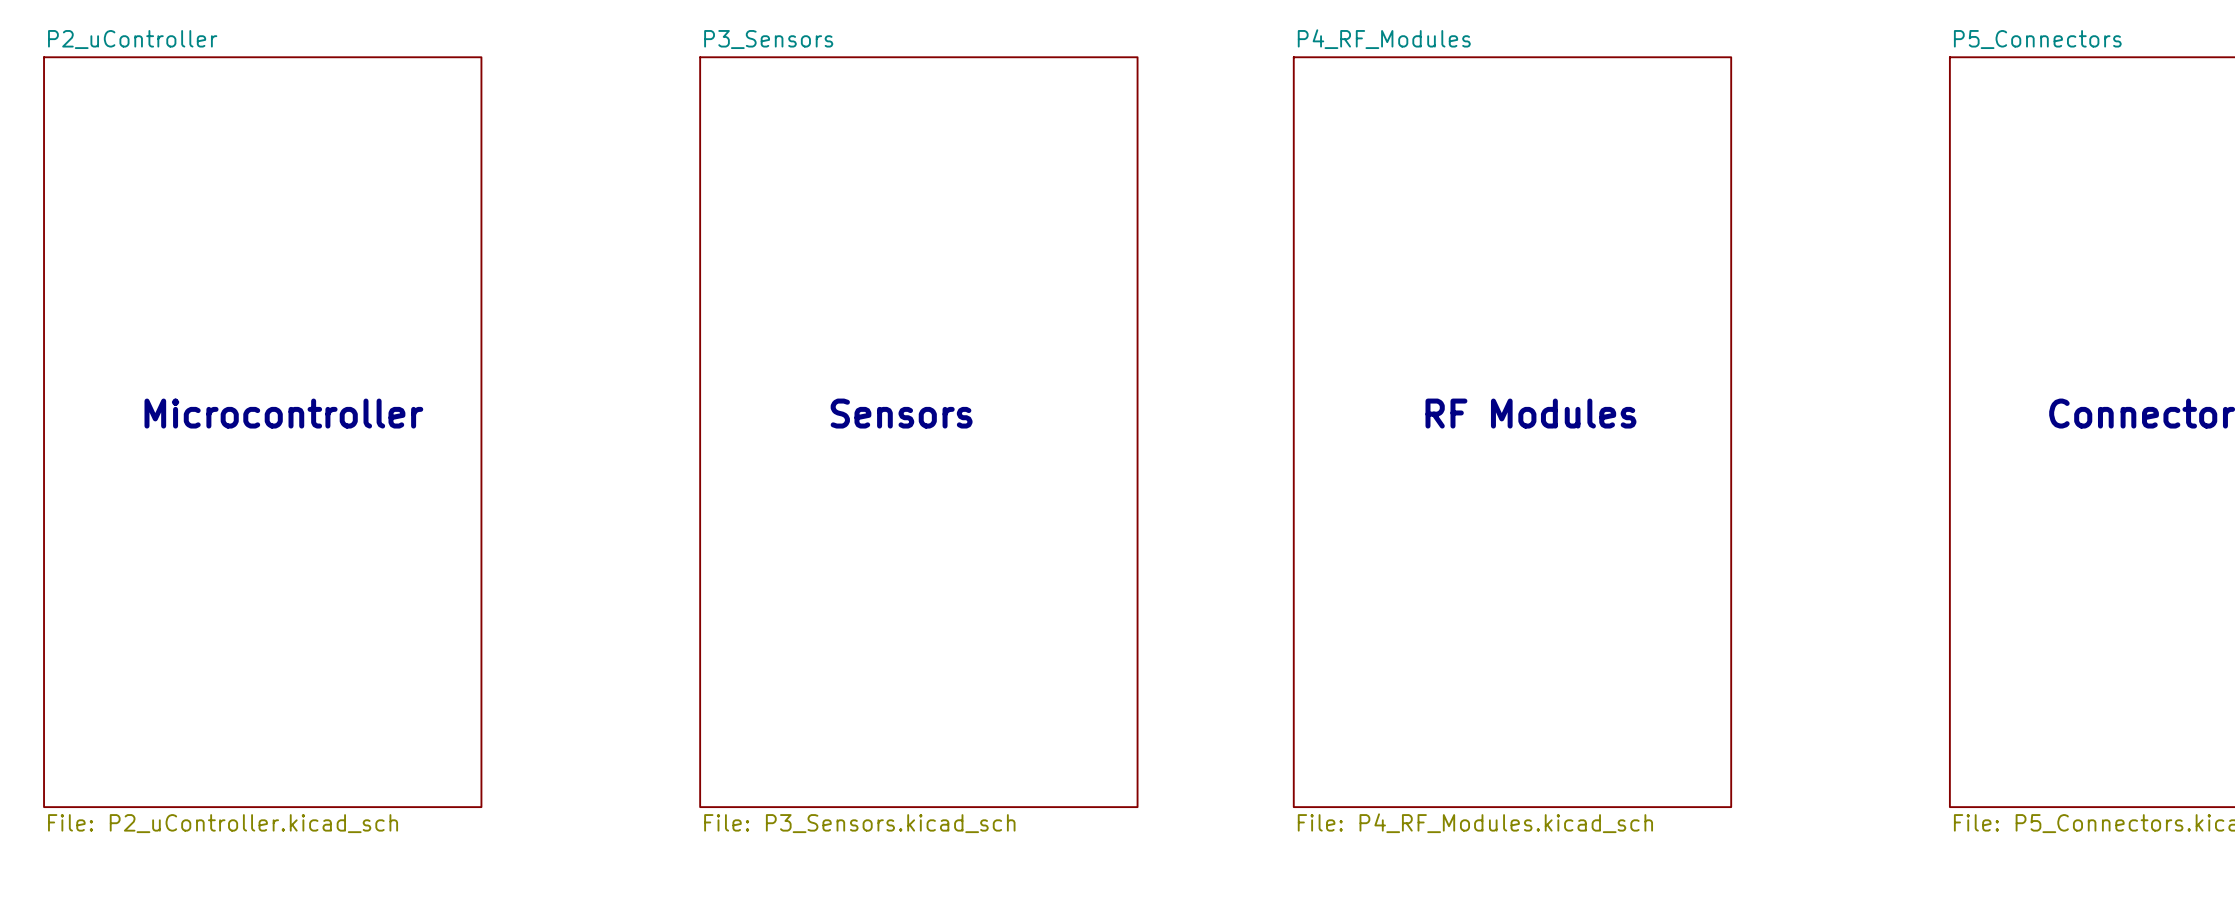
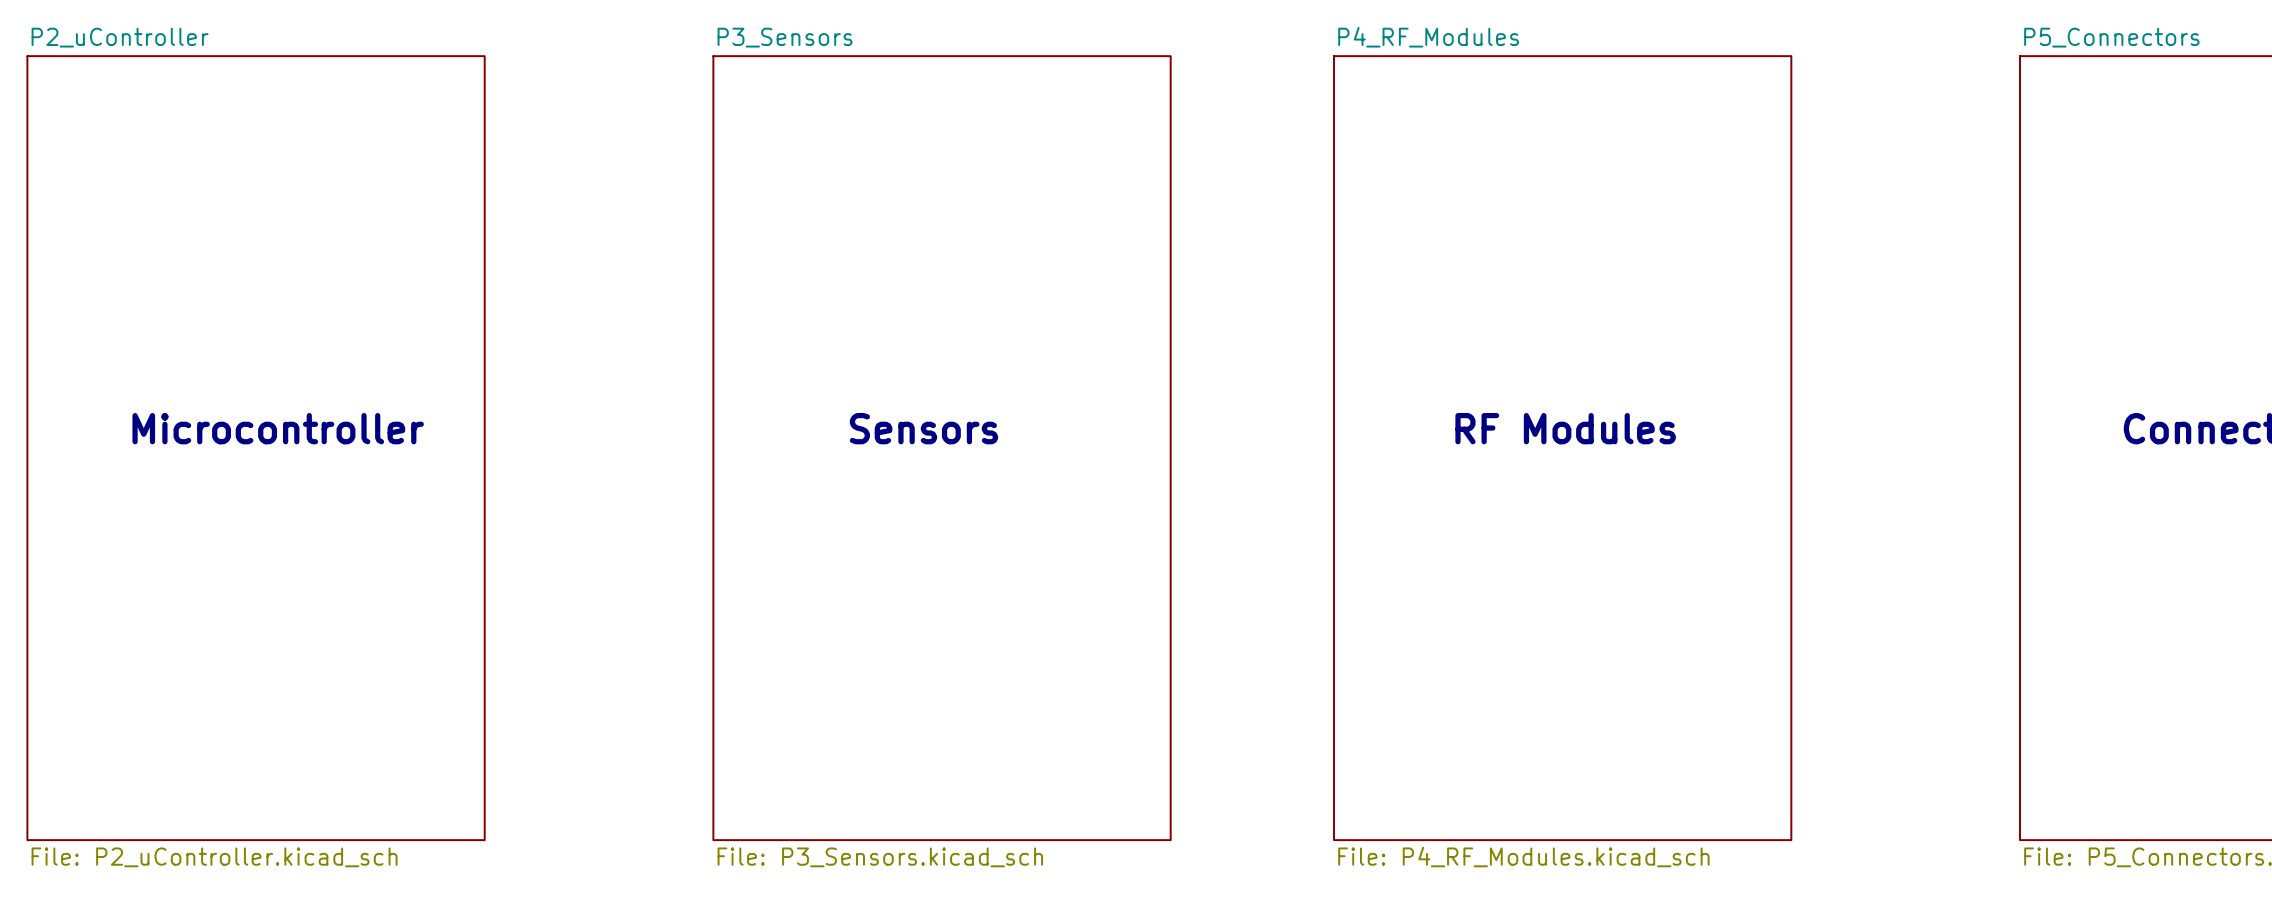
text position: RF Modules (1530, 413) -> RF Modules (1565, 428)

